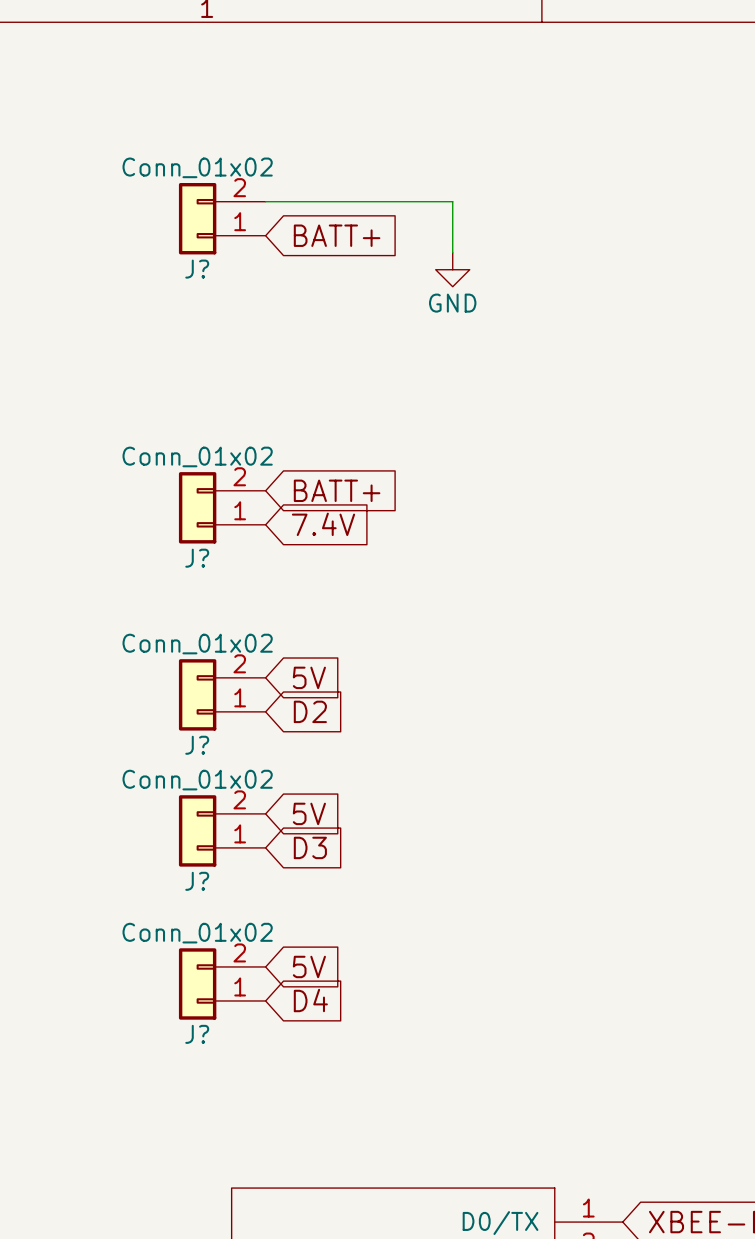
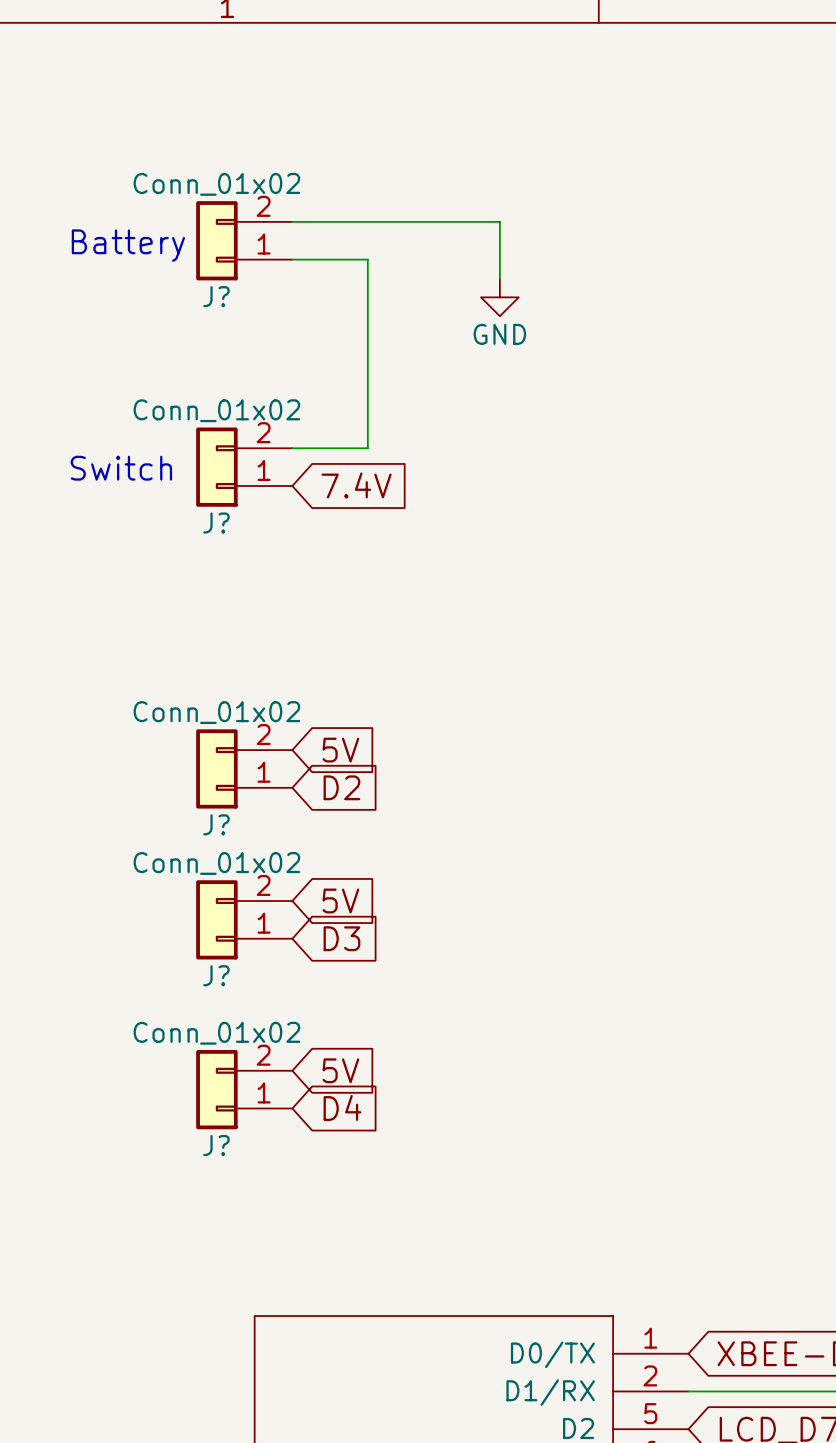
text: none -> Battery (128, 245)
wire: none -> (292, 259) (367, 259) (367, 448) (292, 448)
global label: BATT+ (337, 235) -> none
text: none -> Switch (121, 468)
global label: BATT+ (337, 490) -> none
J? position: (222, 507) -> (244, 467)
global label position: 7.4V (323, 524) -> 7.4V (356, 485)

